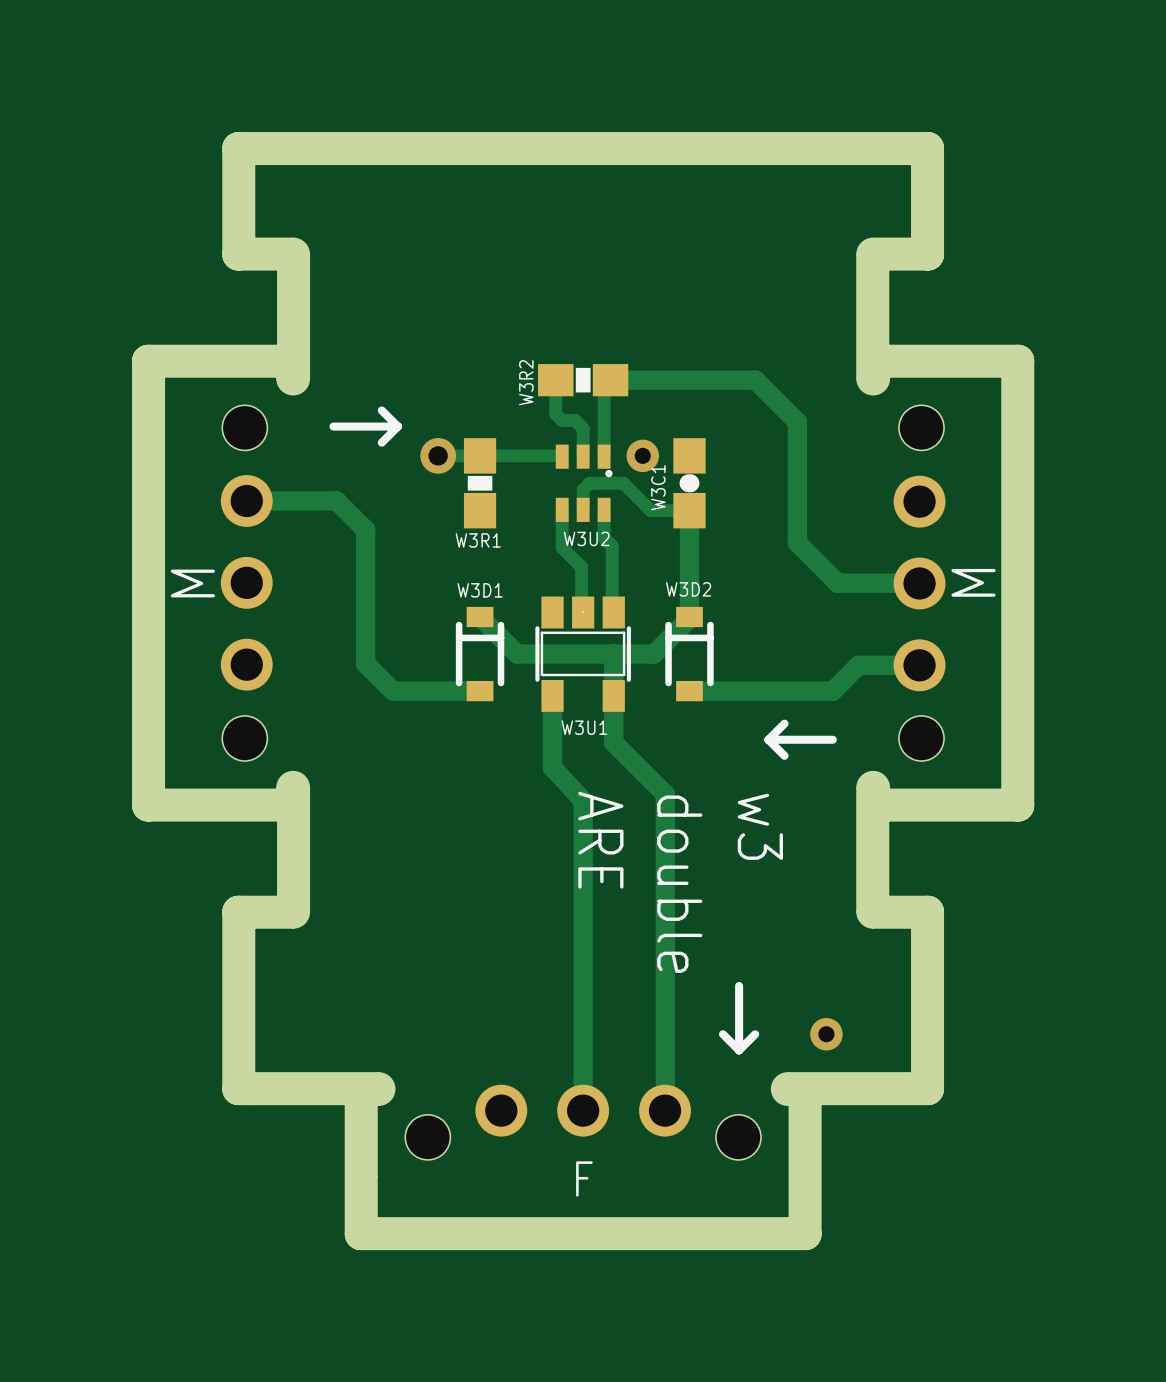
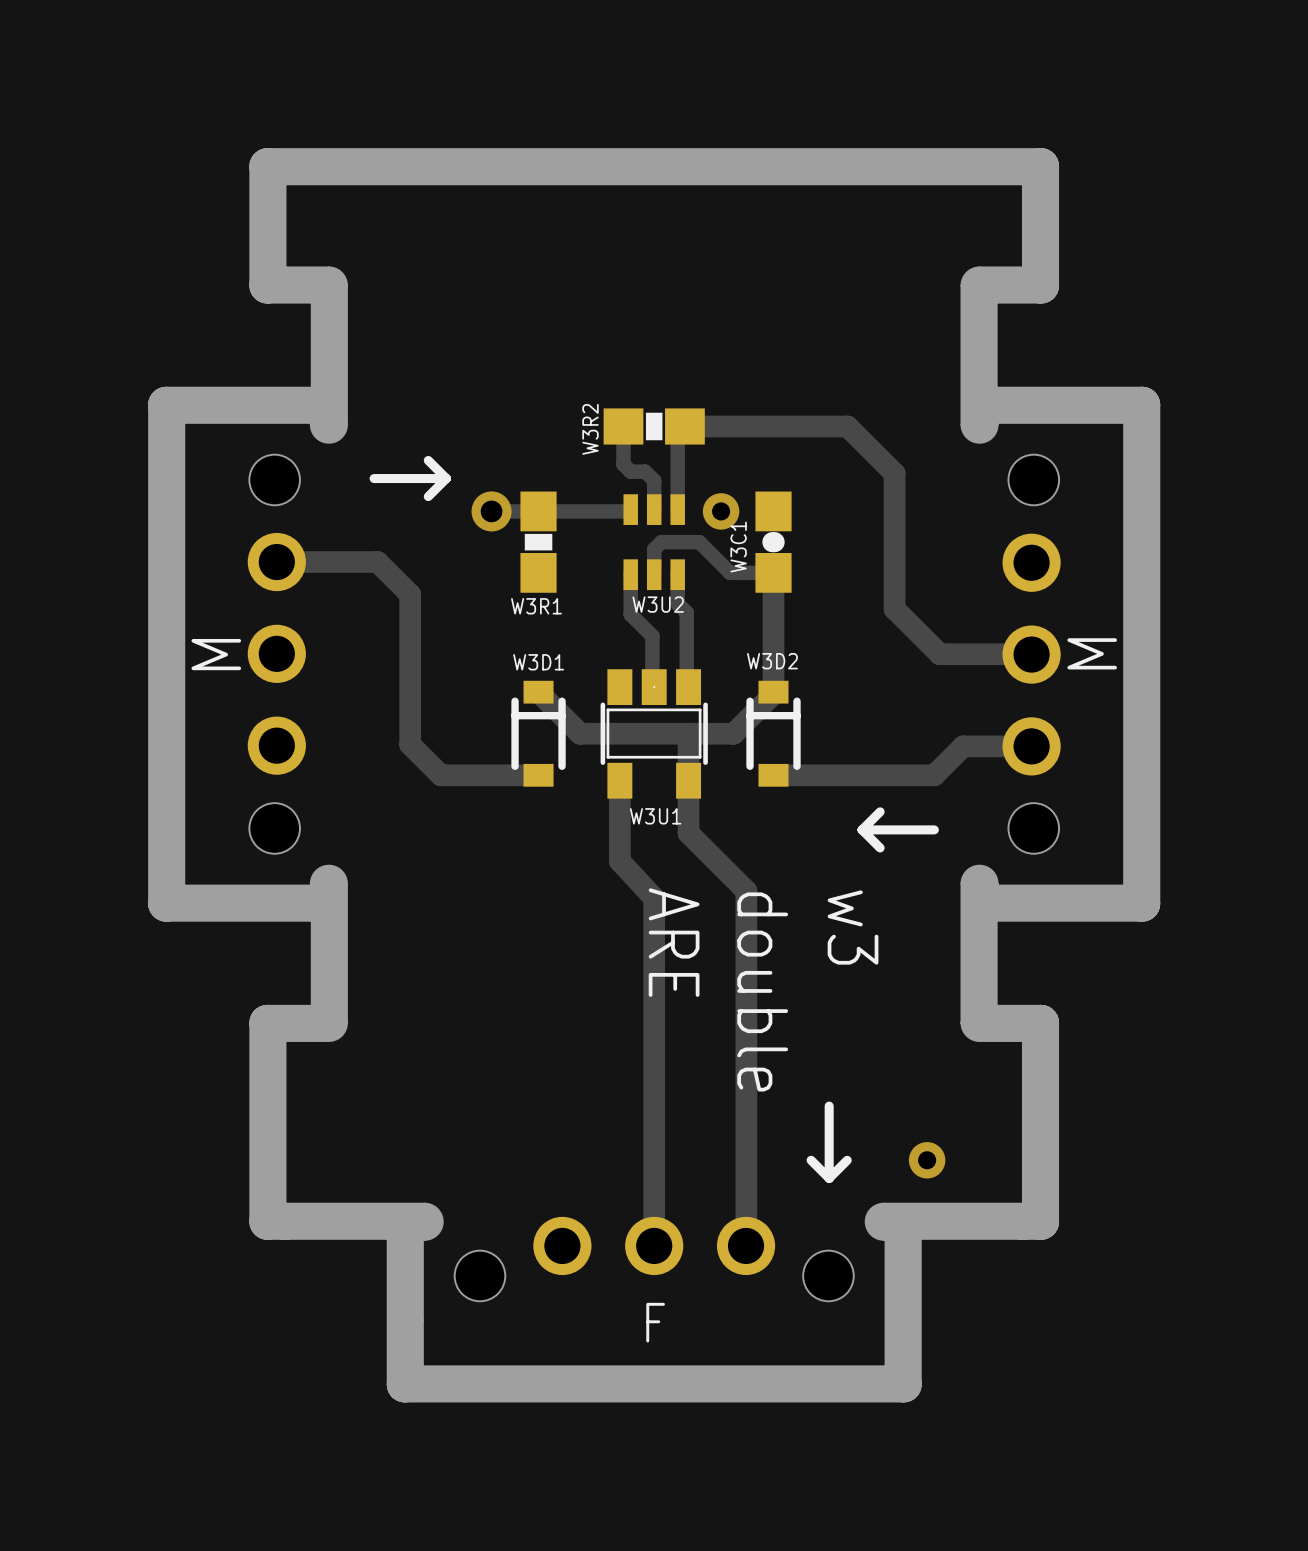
W3U2 footprint: [555, 444, 613, 522] -> [623, 494, 685, 591]

